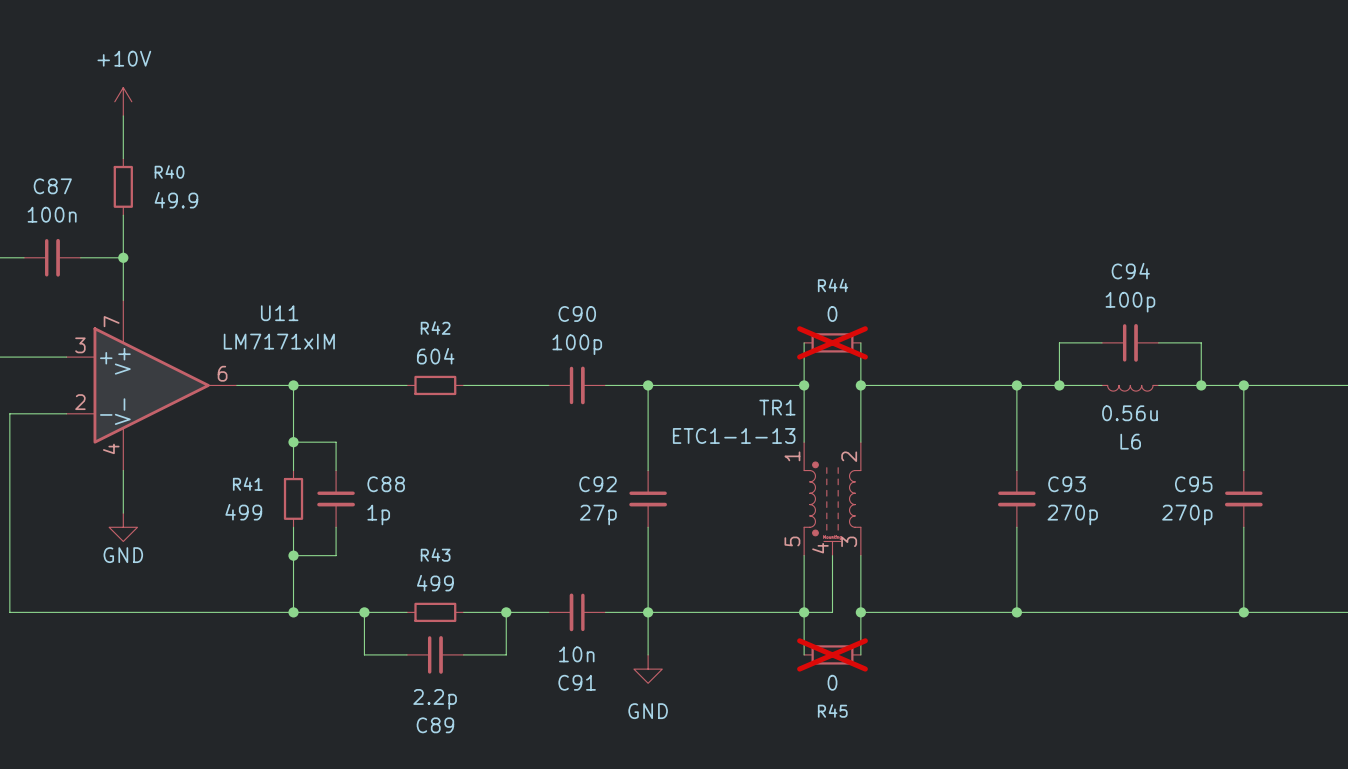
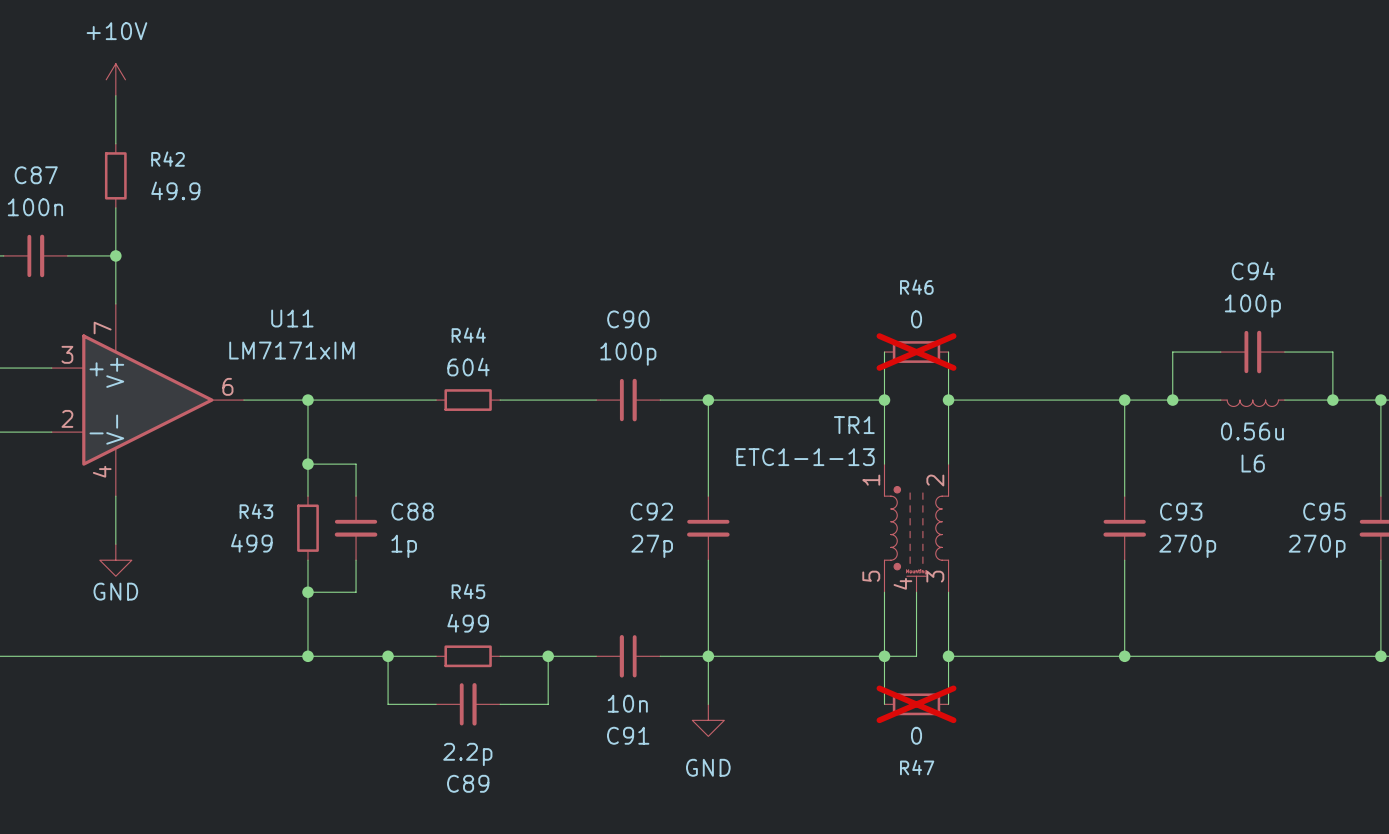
R40 name: R40 (169, 171) -> R42 (168, 159)
R44 name: R44 (833, 285) -> R46 (916, 287)
R42 name: R42 (435, 328) -> R44 (468, 335)
R41 name: R41 (247, 484) -> R43 (256, 511)
R43 name: R43 (435, 554) -> R45 (468, 591)
R45 name: R45 (832, 710) -> R47 (917, 767)

